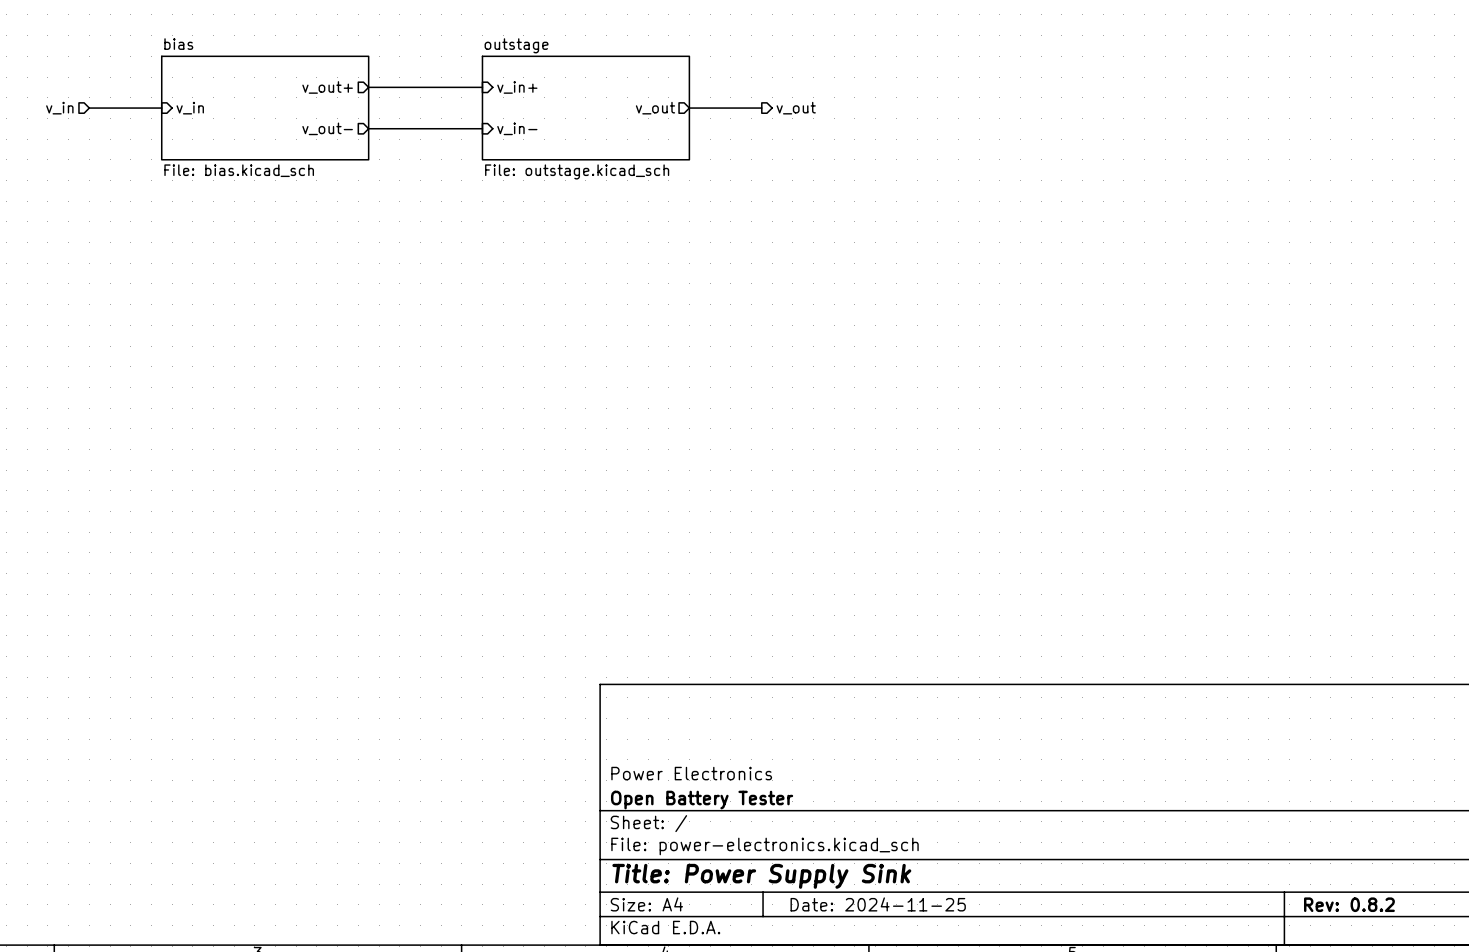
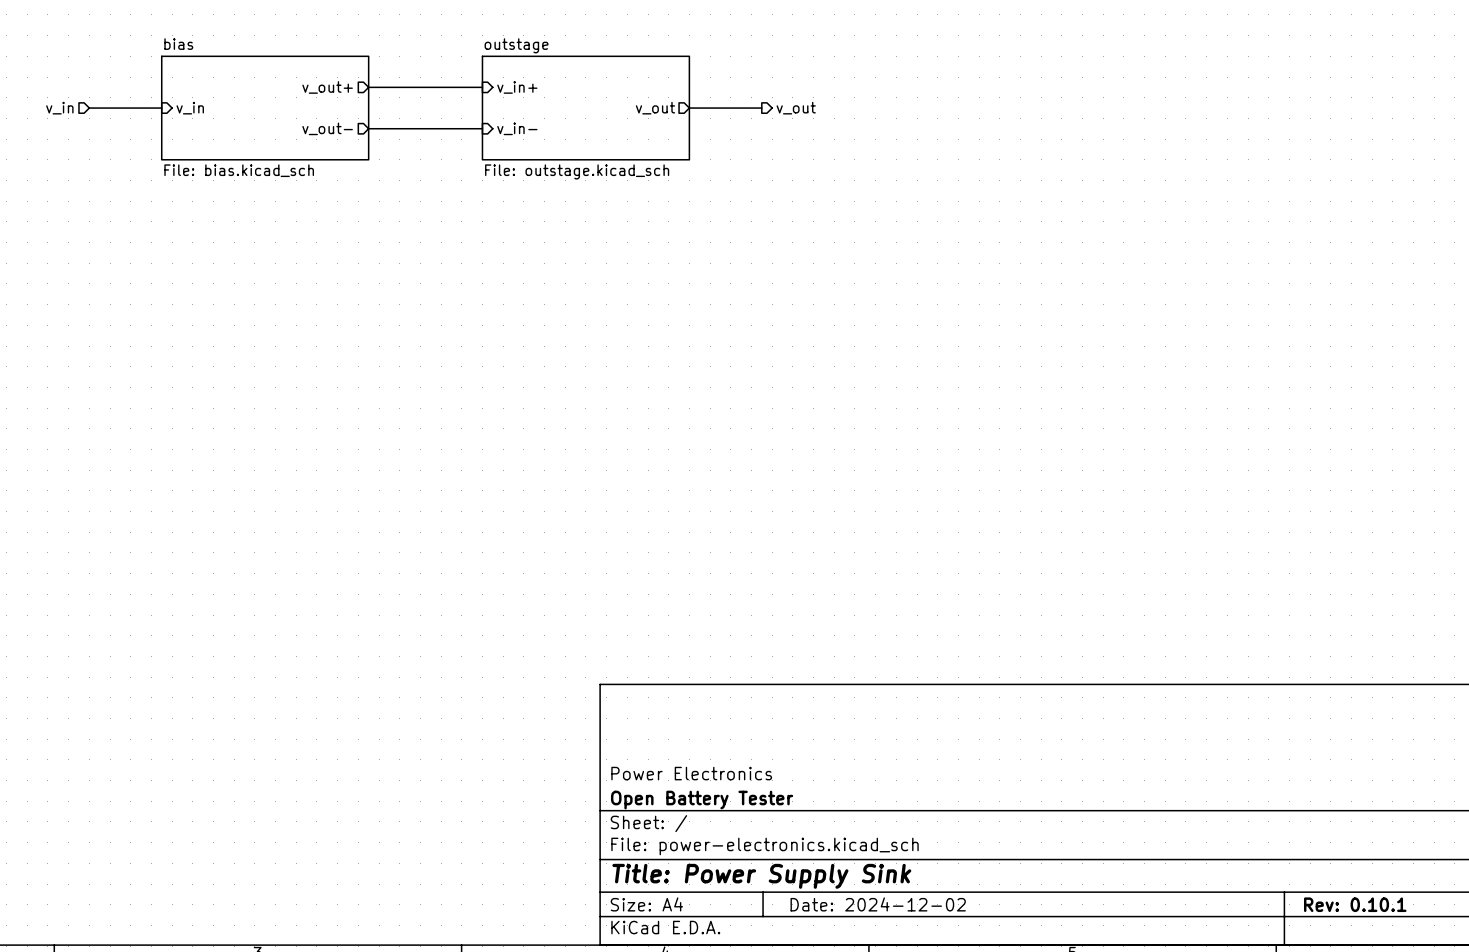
title block: Date: 2024-11-25 (878, 904) -> Date: 2024-12-02 (878, 904)
title block: Rev: 0.8.2 (1349, 904) -> Rev: 0.10.1 (1355, 904)

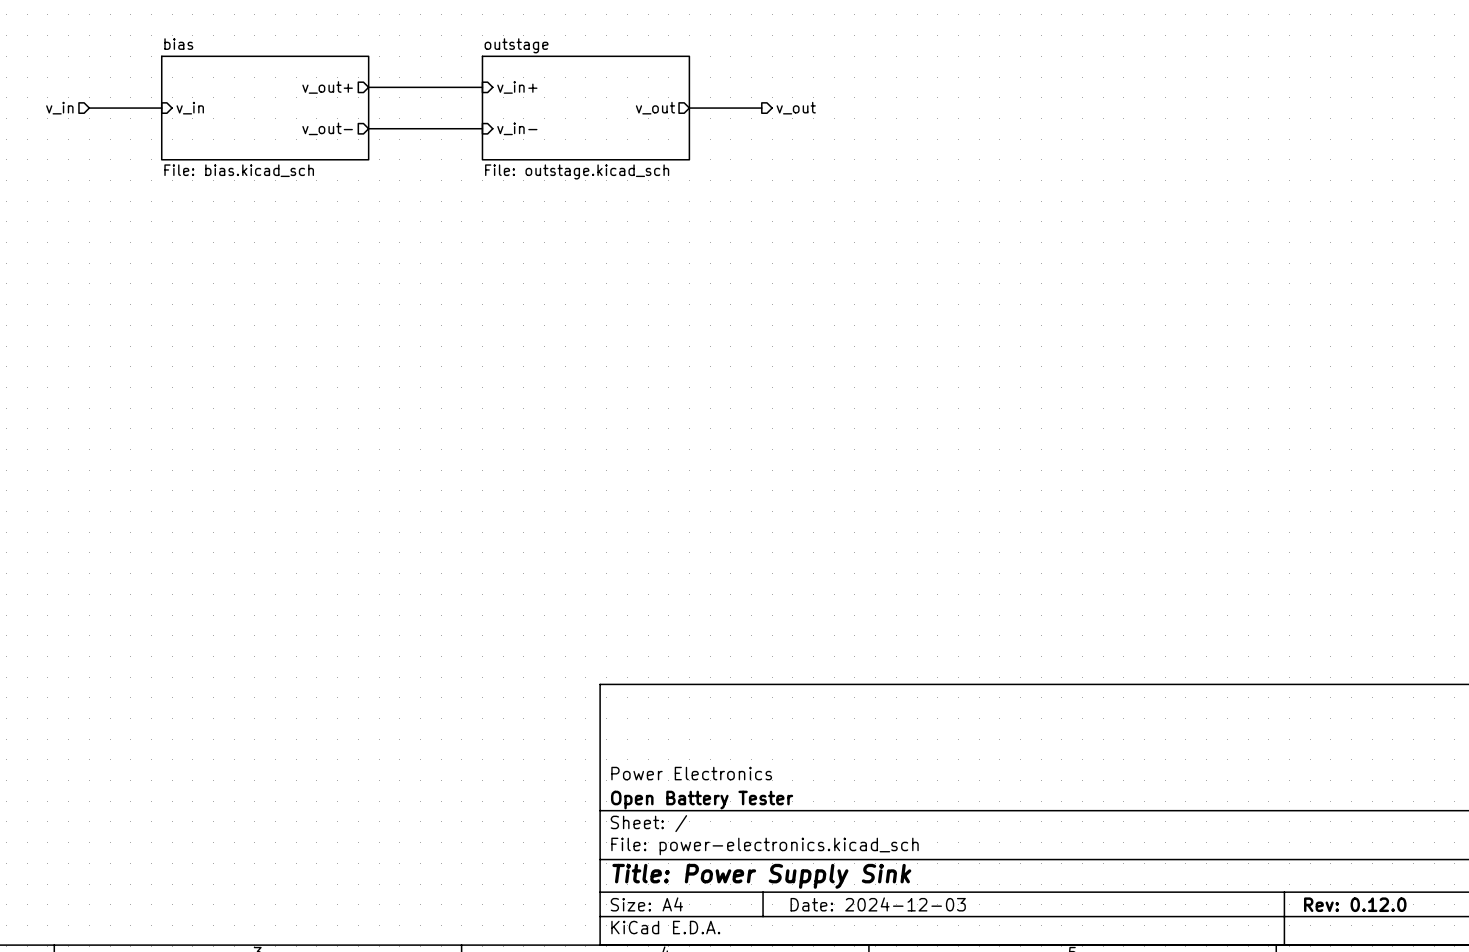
title block: Date: 2024-12-02 (878, 904) -> Date: 2024-12-03 (878, 904)
title block: Rev: 0.10.1 (1355, 904) -> Rev: 0.12.0 (1355, 904)

